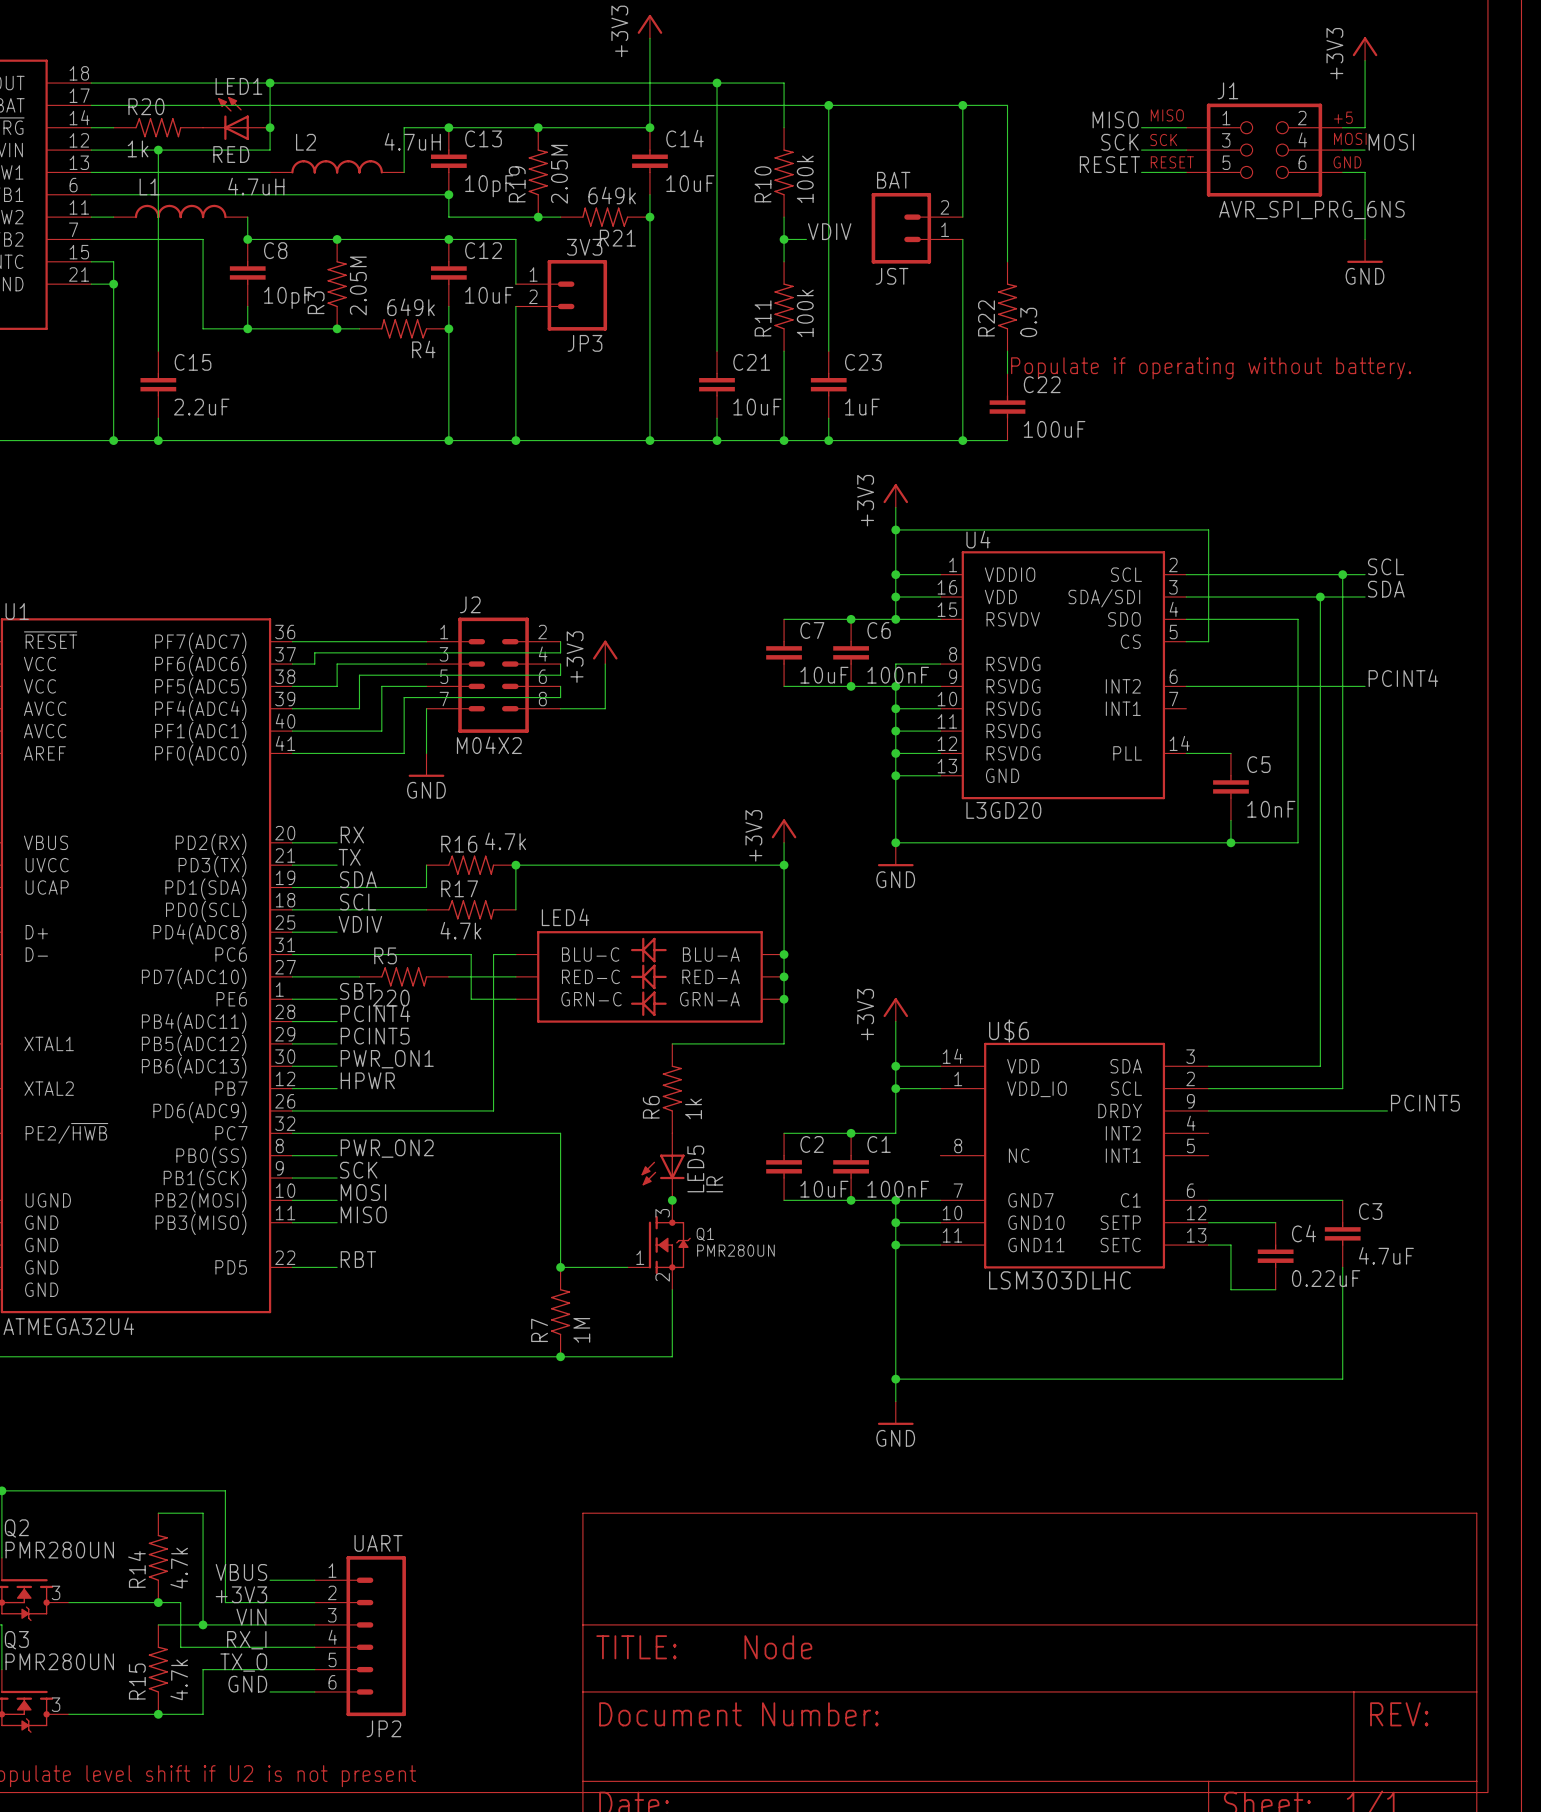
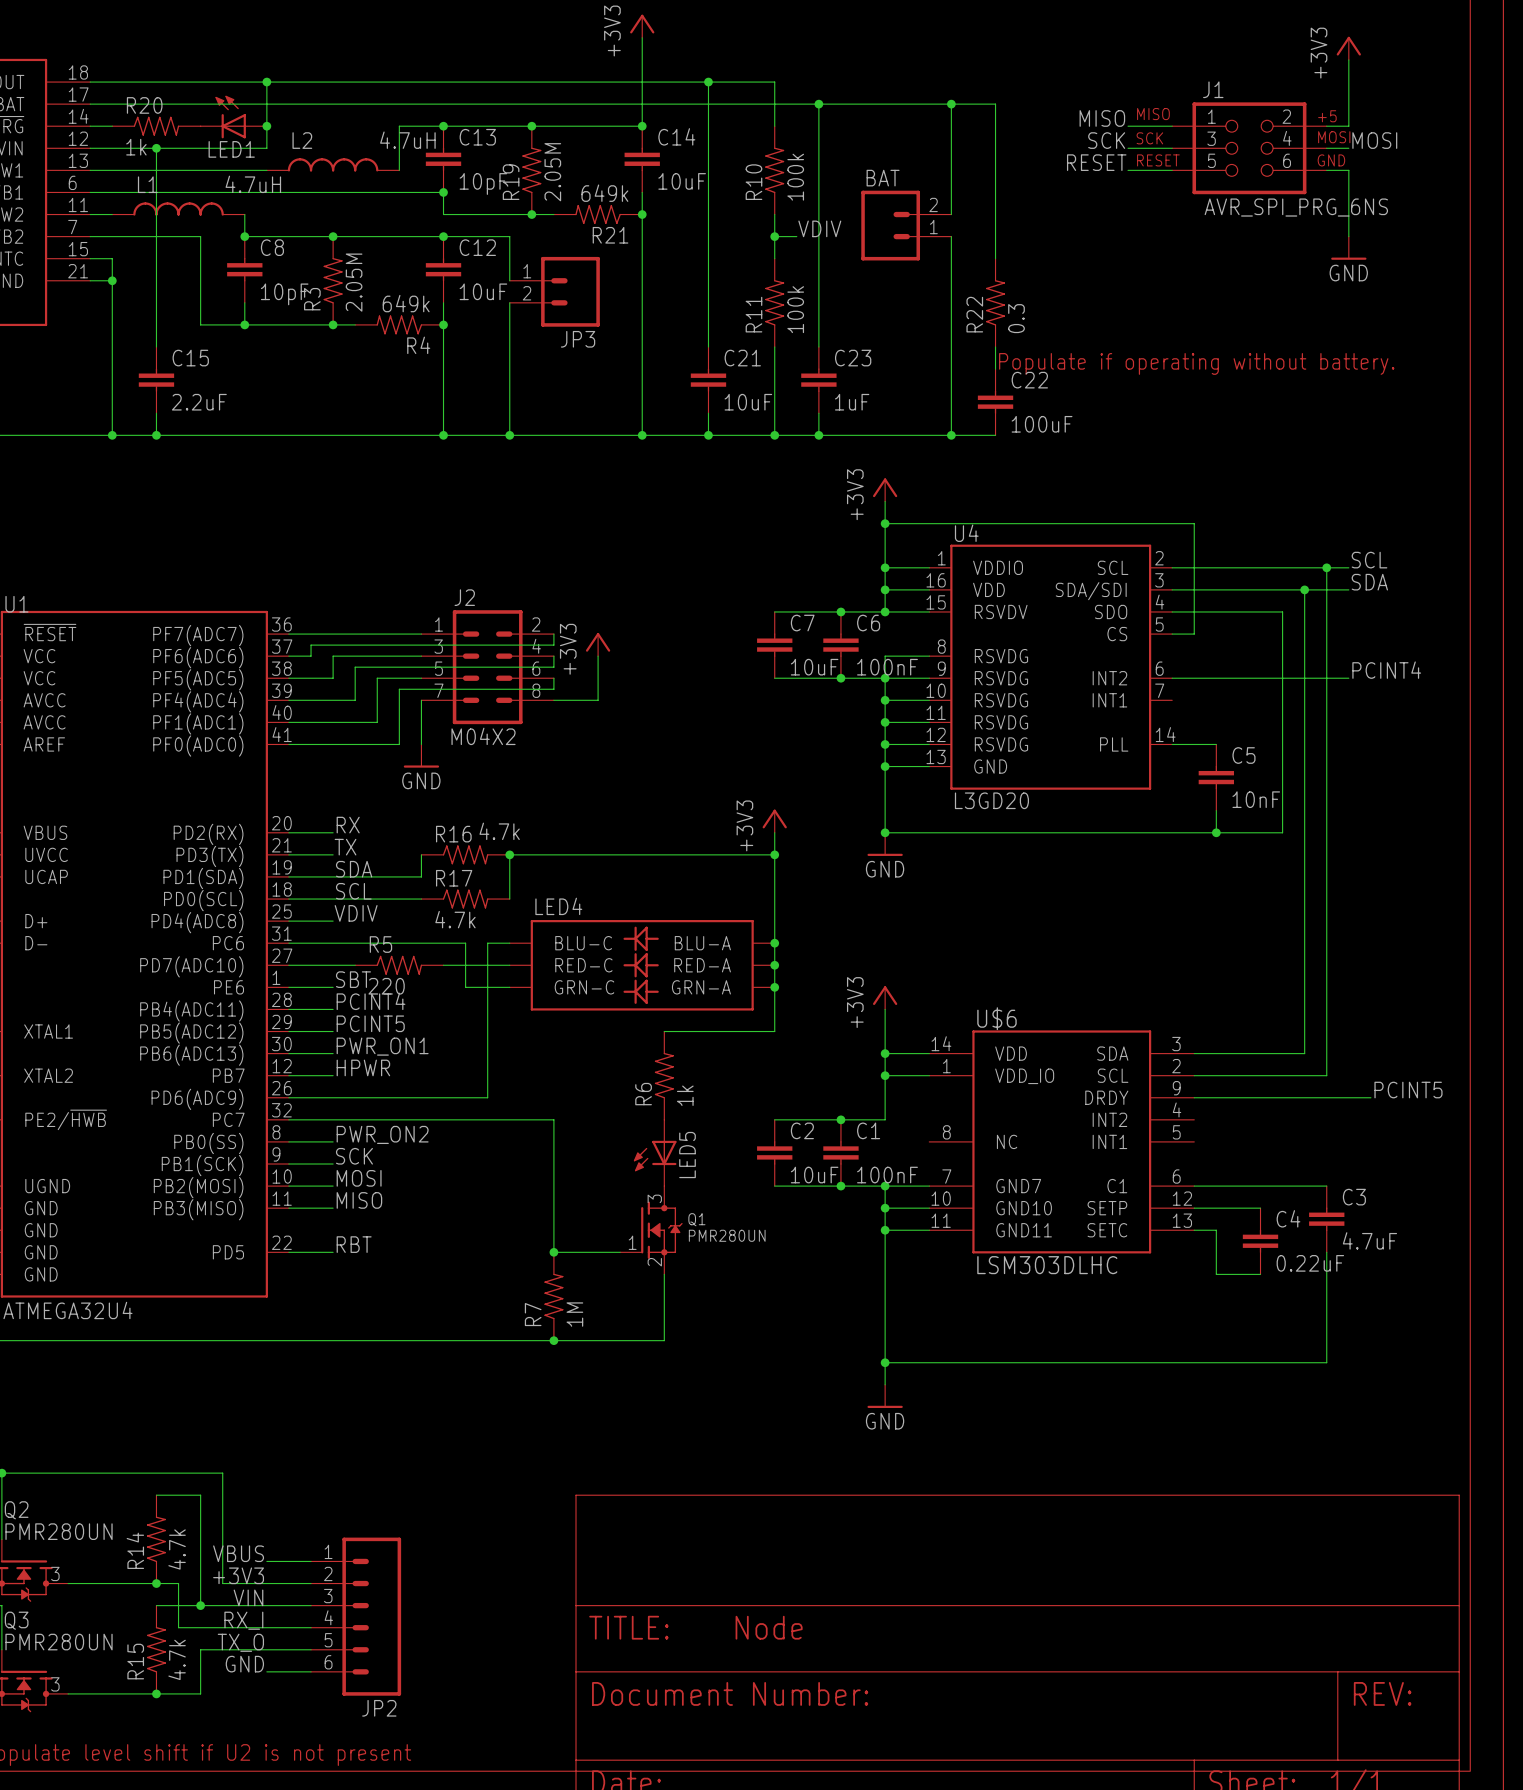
LED1 name position: LED1 (238, 86) -> LED1 (231, 149)
LED1 value: RED (231, 154) -> none
JP3 value: 3V3 (584, 247) -> none
BAT value: JST (892, 276) -> none
LED5 value: IR (714, 1184) -> none
junction: (672, 1200) -> none
JP2 value: UART (378, 1543) -> none

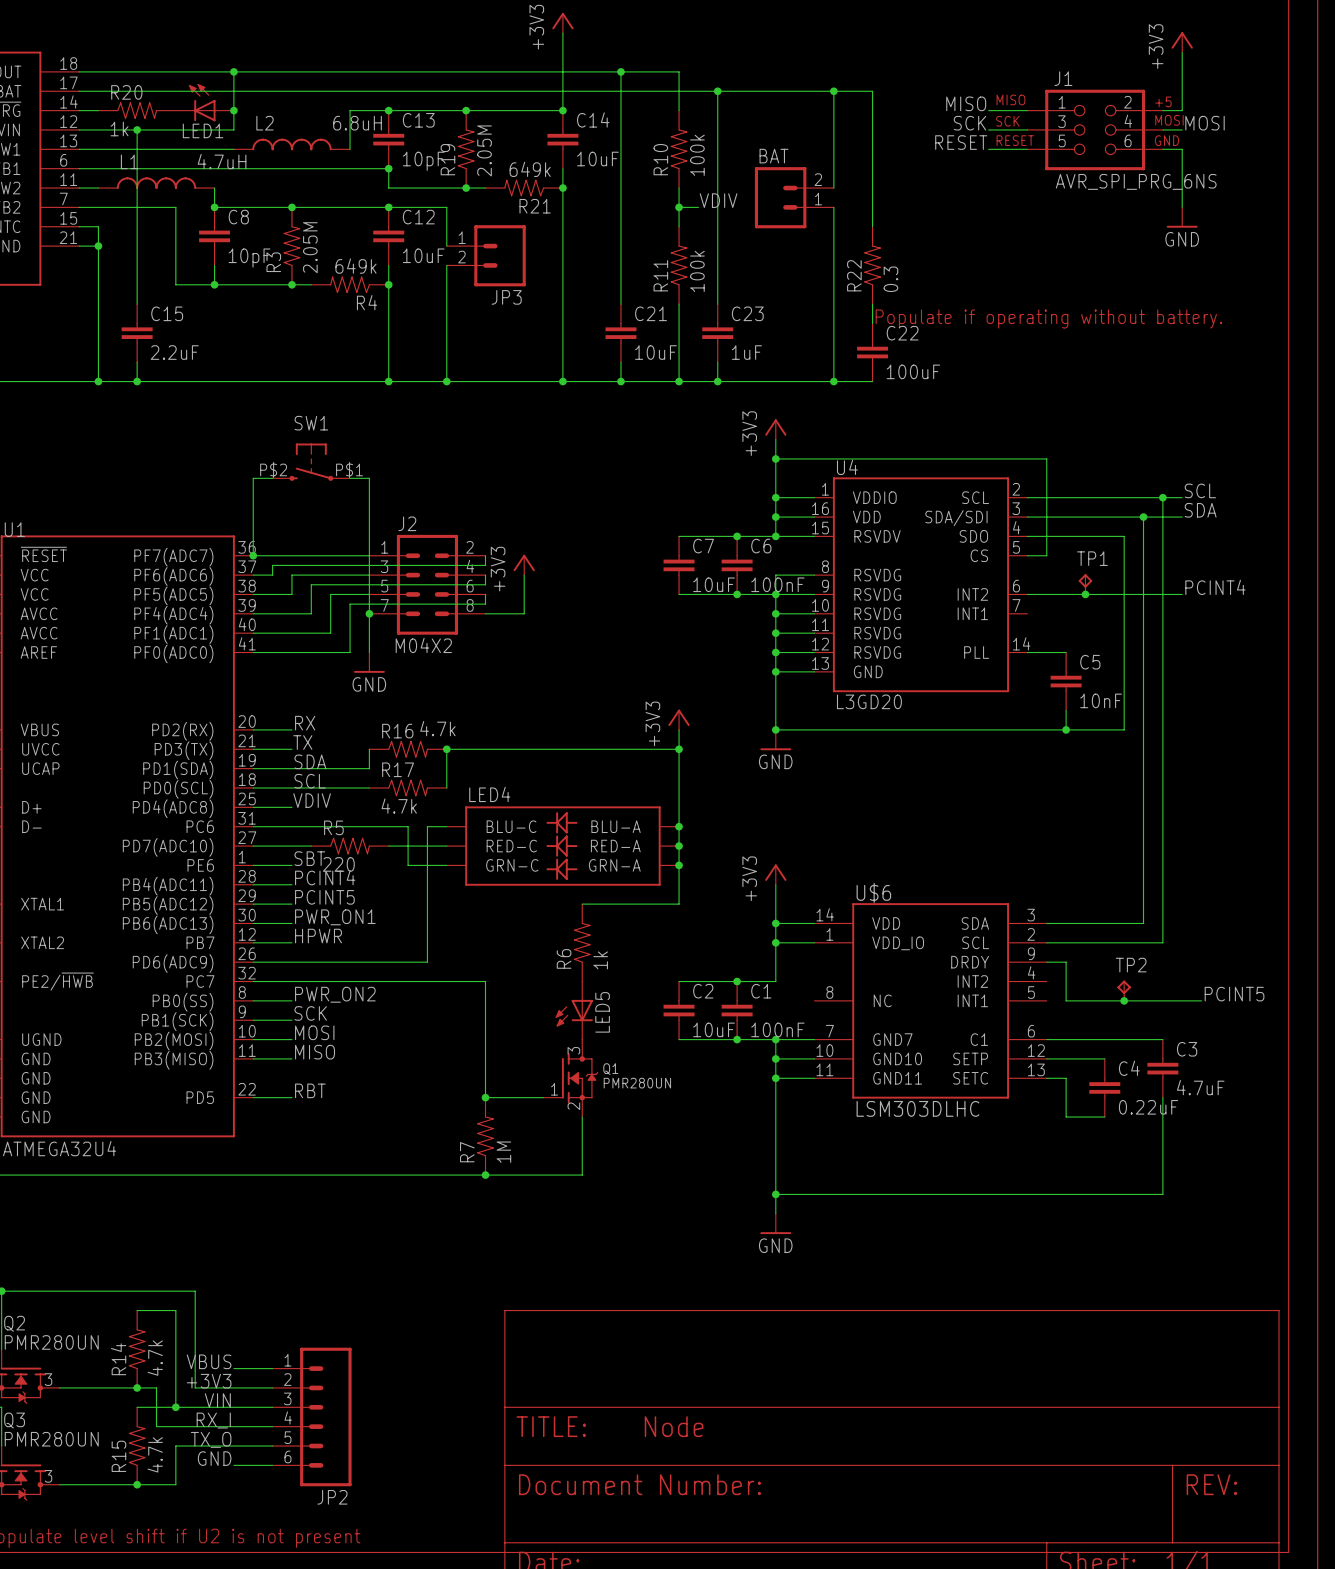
L2 value: 4.7uH (407, 140) -> 6.8uH (357, 123)
SW1: none -> (311, 462)
wire: none -> (272, 478) (253, 478) (253, 555)
wire: none -> (350, 478) (369, 478) (369, 613)
junction: none -> (253, 555)
TP1: none -> (1085, 584)
junction: none -> (1085, 594)
junction: none -> (369, 613)
label position: PCINT5 (1408, 1090) -> PCINT5 (1234, 994)
wire: (1216, 1097) (1370, 1097) -> (1066, 962) (1066, 1000) (1201, 1000)
TP2: none -> (1124, 990)
junction: none -> (1124, 1000)

